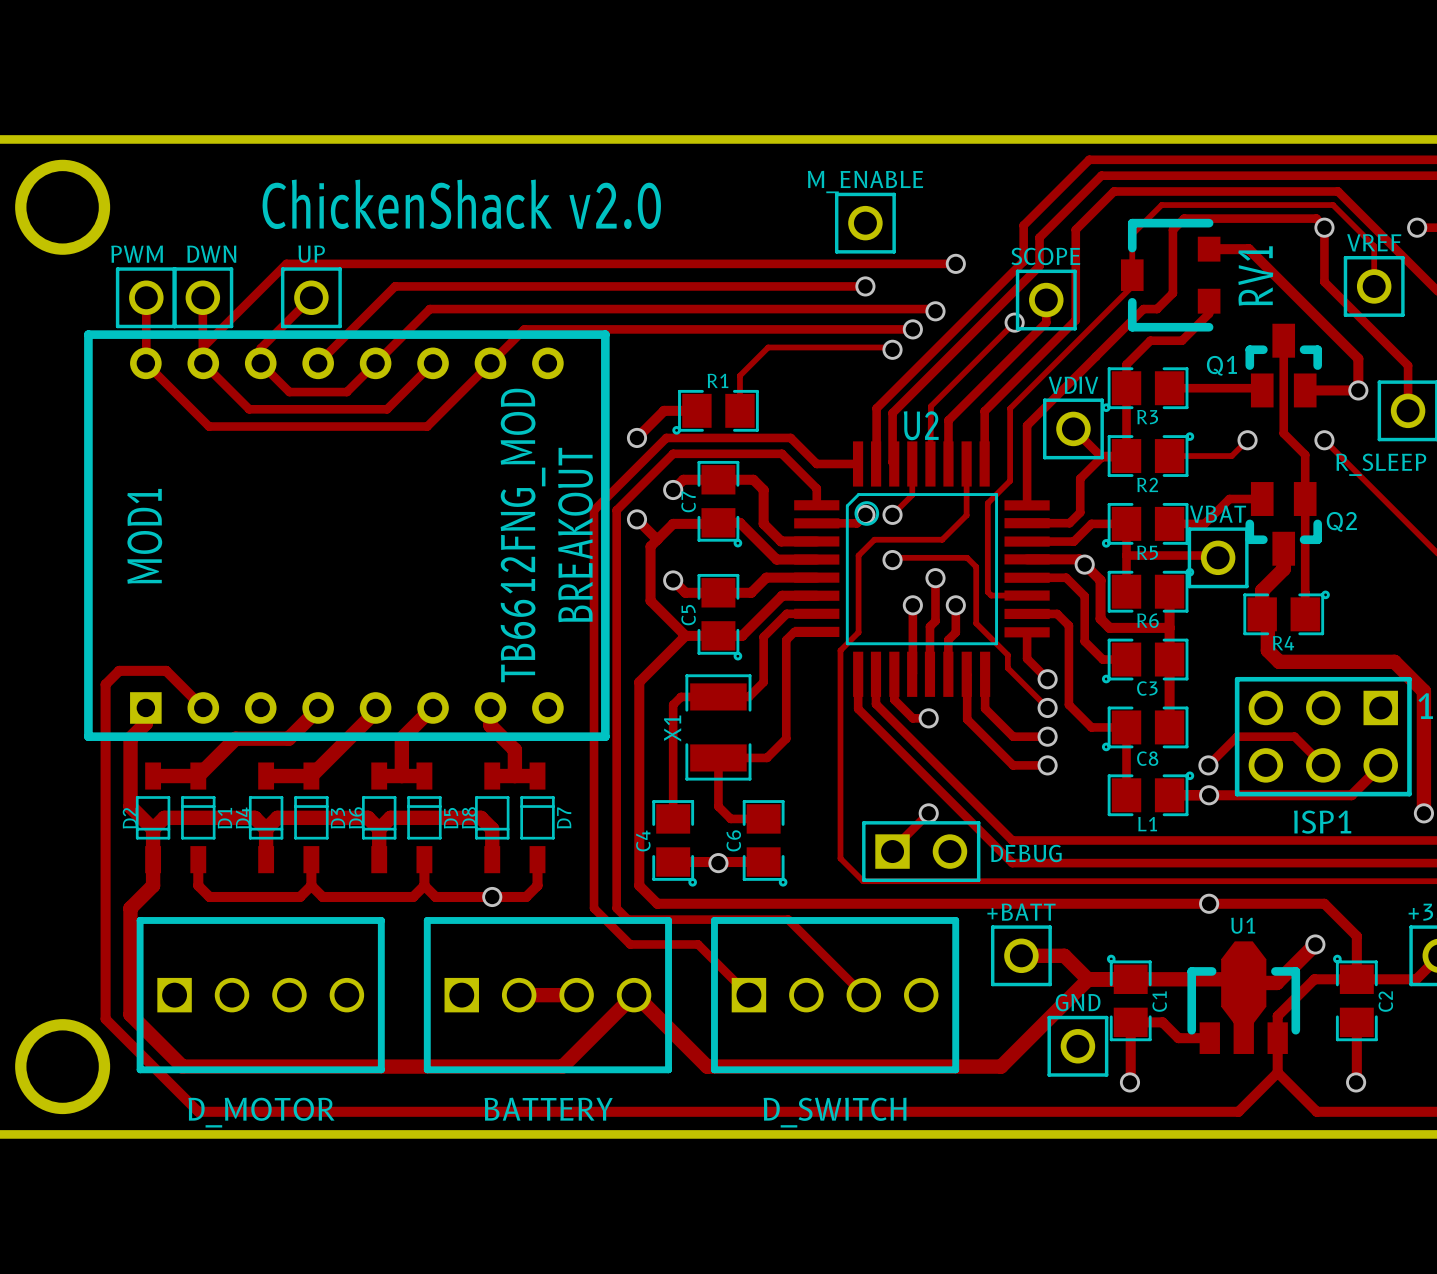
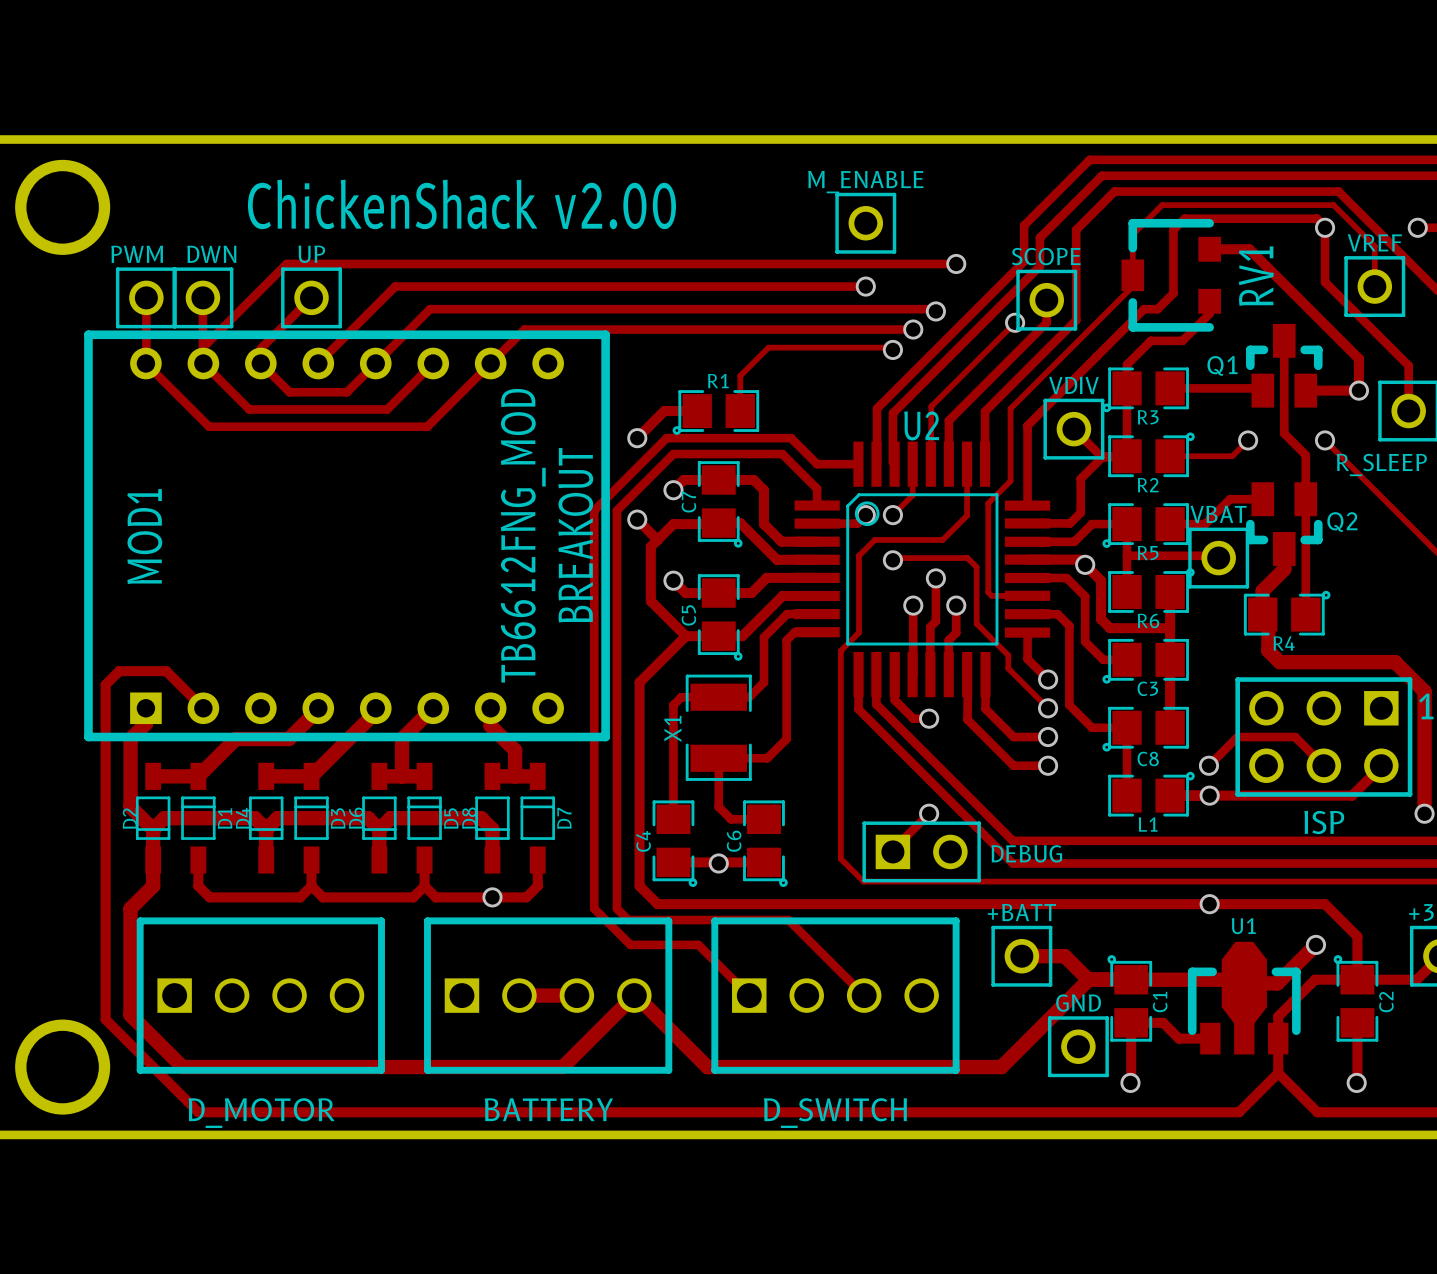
text: ChickenShack v2.0 (461, 204) -> ChickenShack v2.00 (461, 204)
ISP1 name: ISP1 (1322, 822) -> ISP (1324, 822)

